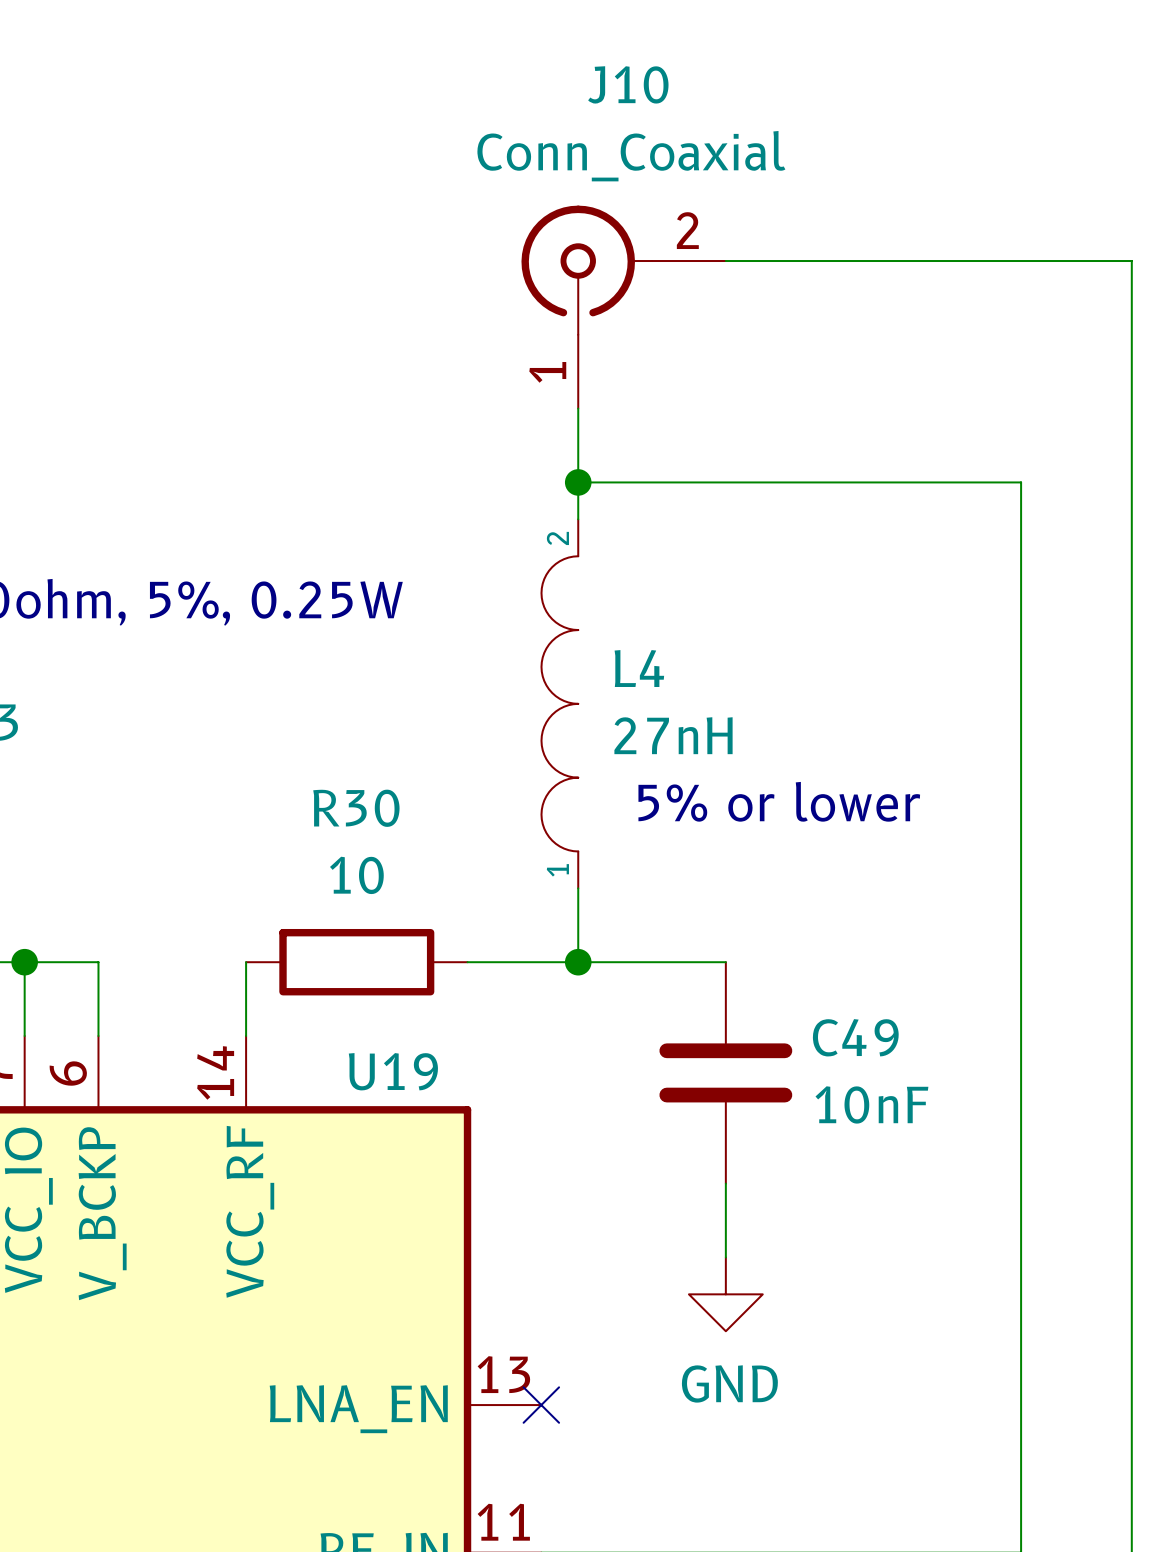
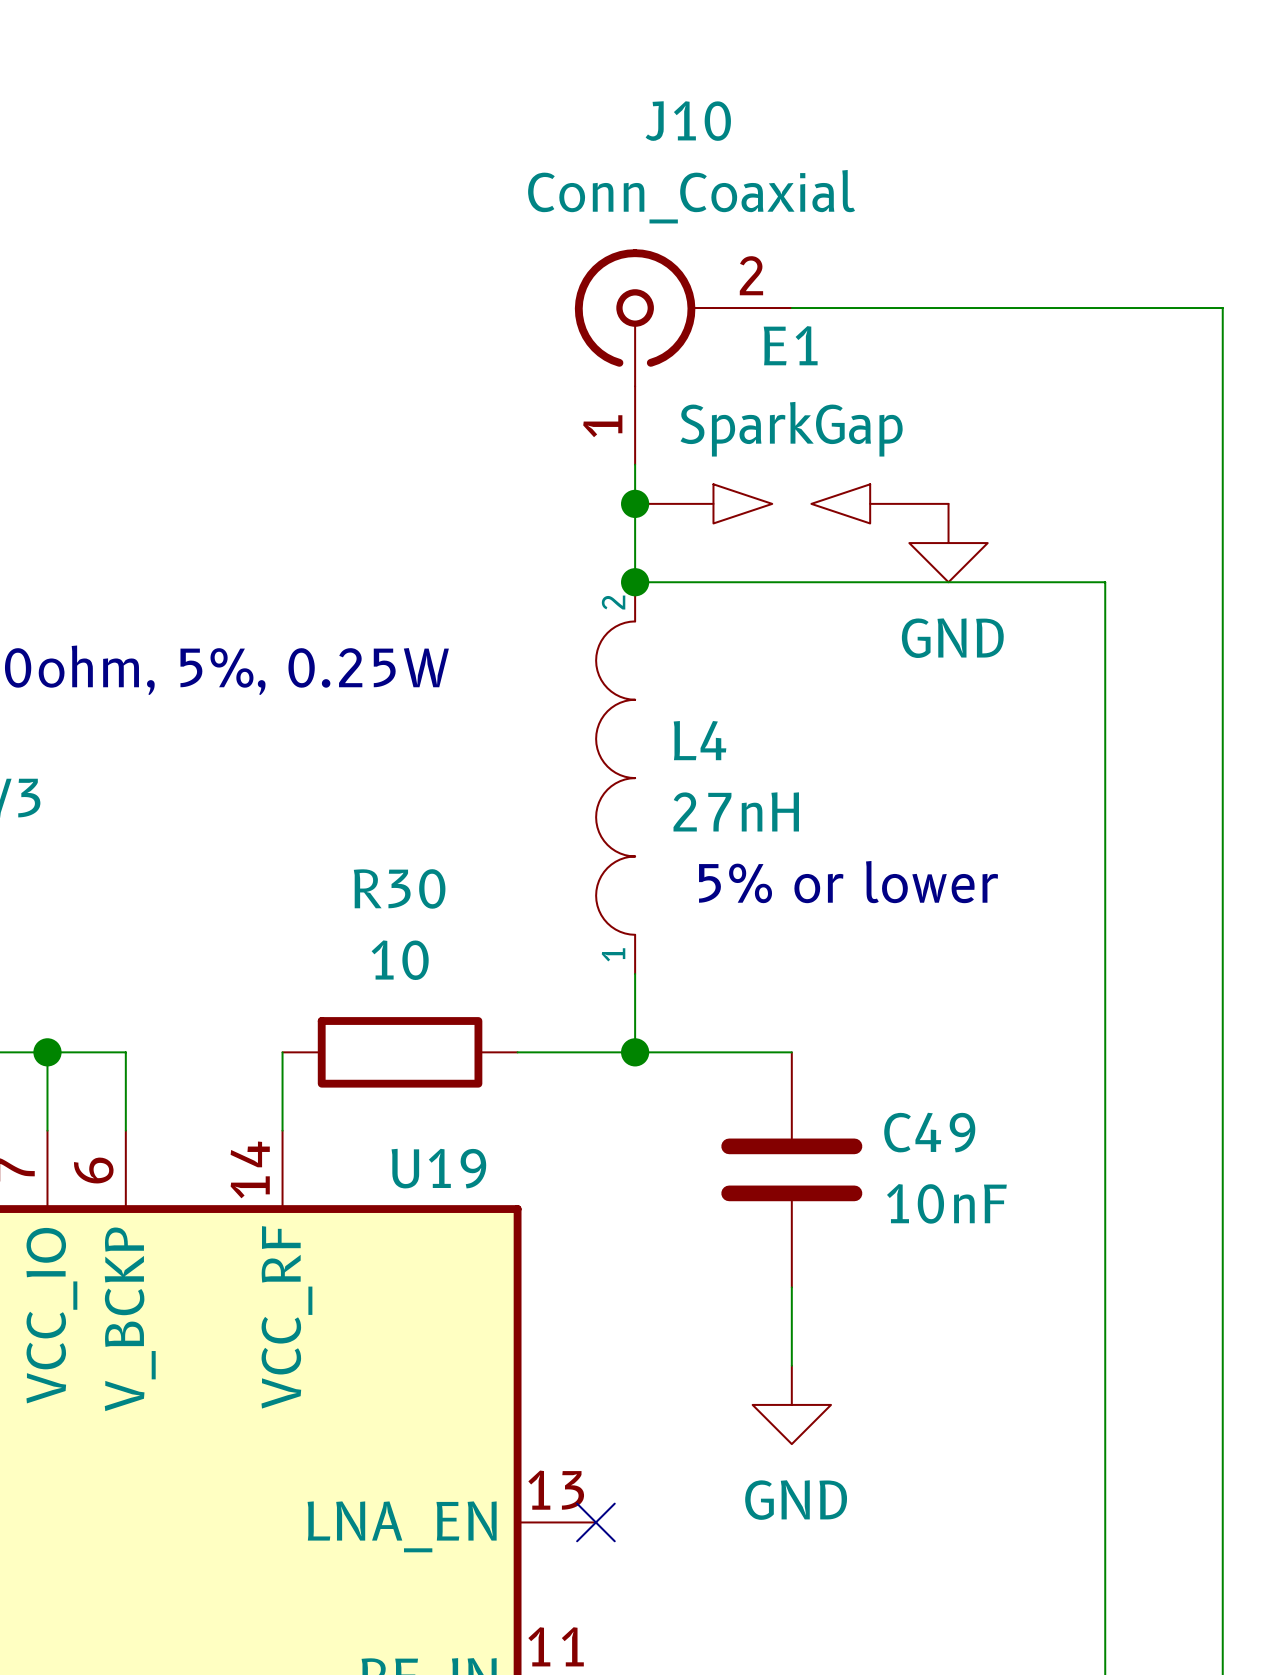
junction: none -> (635, 503)
E1: none -> SparkGap (791, 503)
wire: (578, 482) (1021, 482) (1021, 519) -> (635, 582) (1105, 582)
junction: (578, 482) -> none
power symbol: none -> GND (948, 543)
junction: none -> (635, 582)

